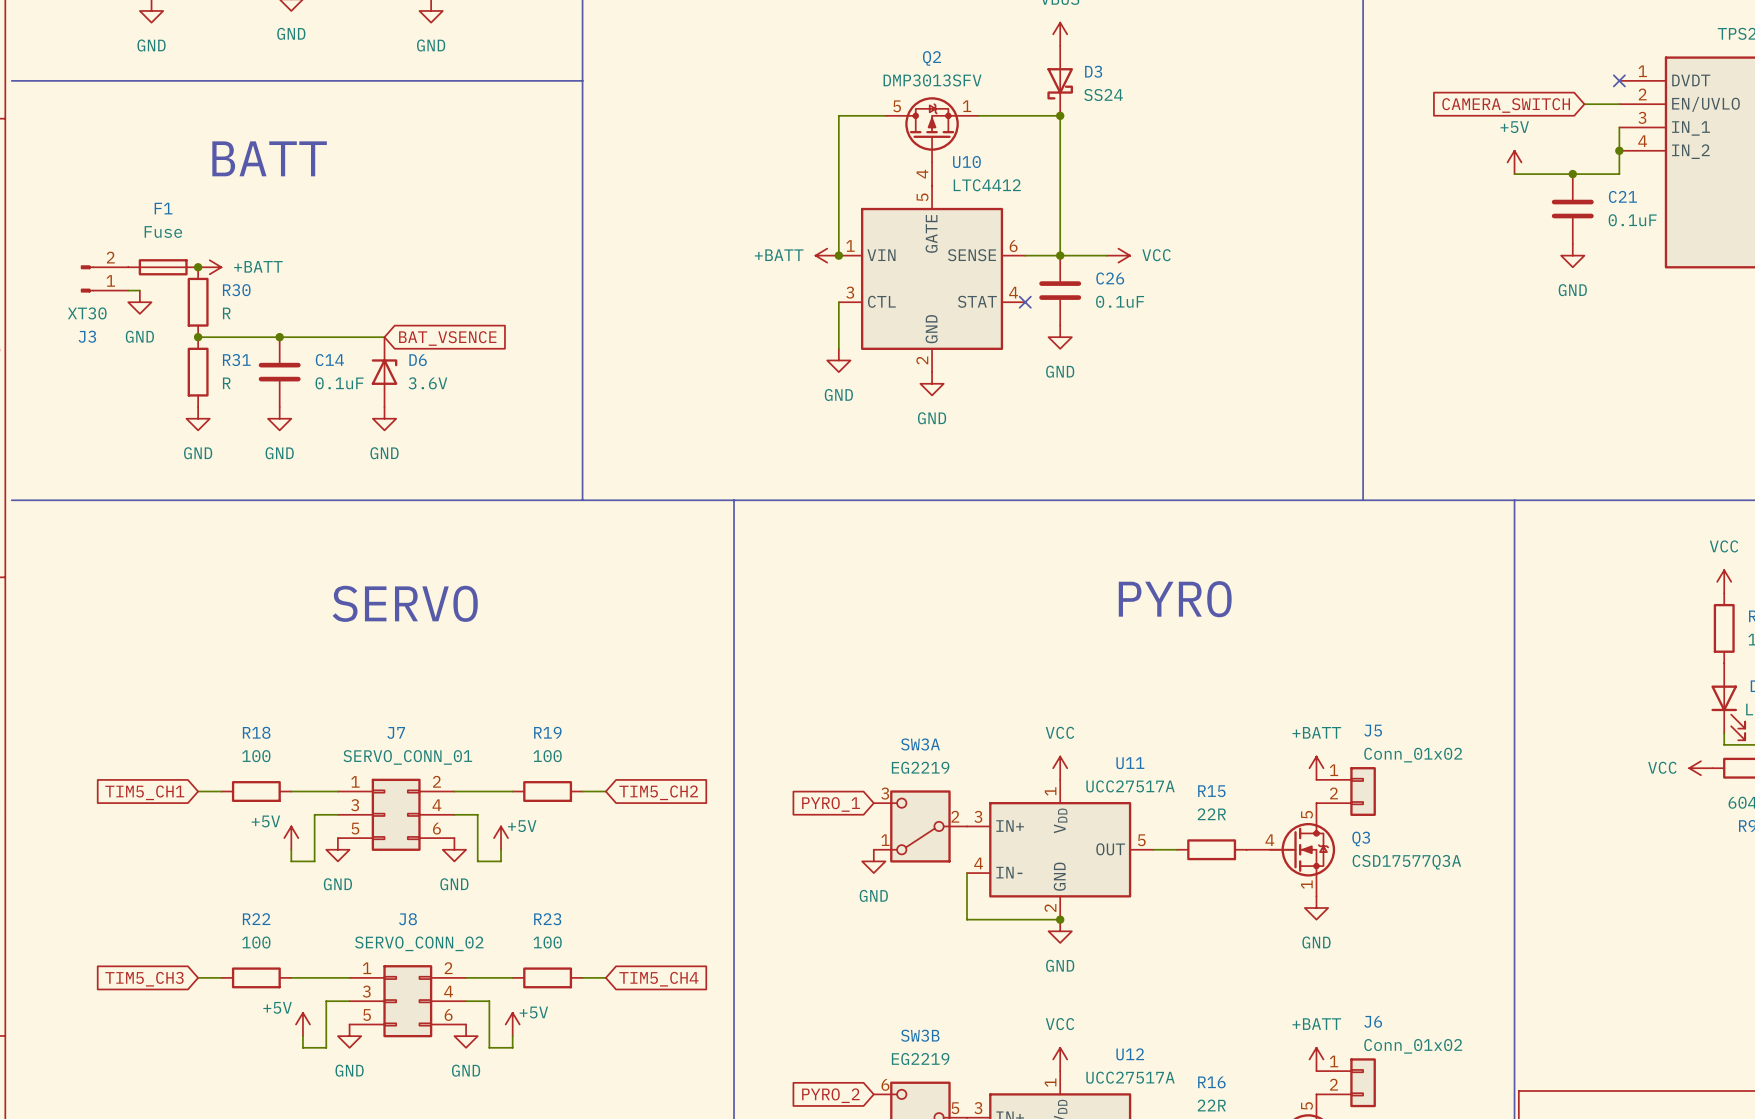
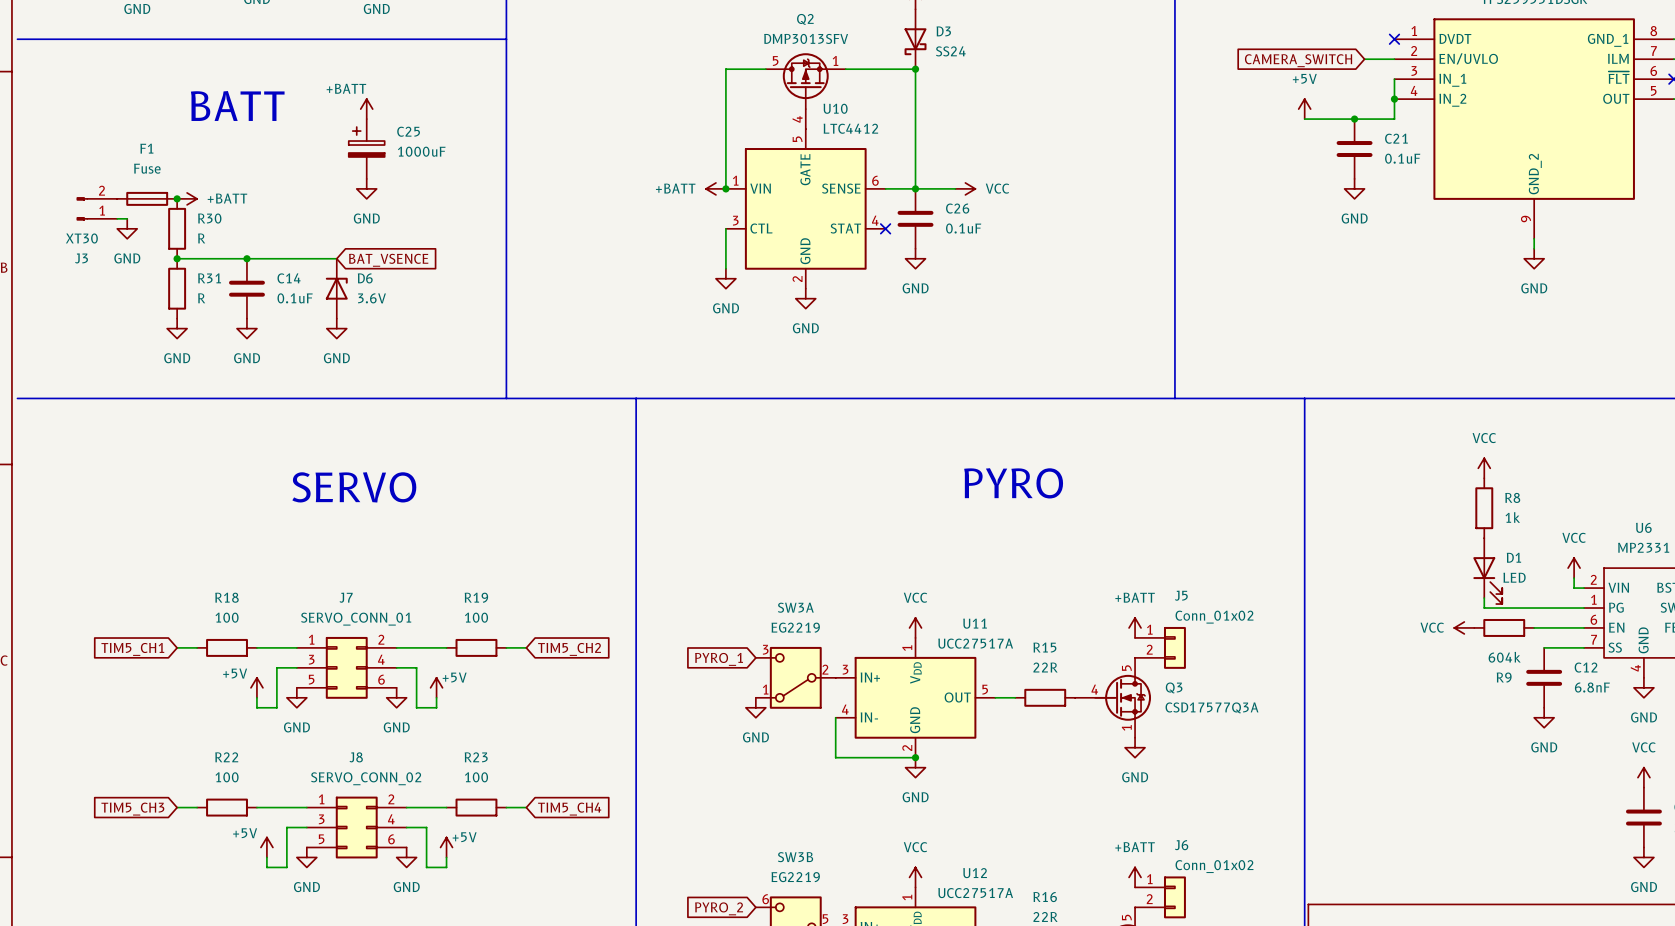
power symbol: none -> +BATT (366, 109)
C25: none -> 1000uF (366, 149)
power symbol: none -> GND (366, 188)

